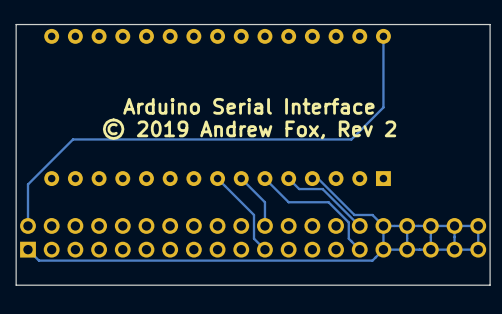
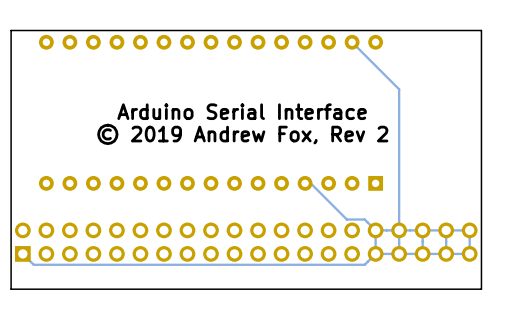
track: none -> (352, 42) (399, 89) (399, 230)
track: (383, 36) (383, 107) (351, 139) (73, 139) (27, 184) (27, 225) -> none
track: (217, 178) (254, 214) (254, 238) (264, 249) -> none
track: (241, 178) (264, 202) (264, 225) -> none
track: (264, 178) (288, 202) (328, 202) (348, 222) (348, 238) (359, 249) -> none
track: (288, 178) (299, 189) (322, 189) (359, 225) -> none

